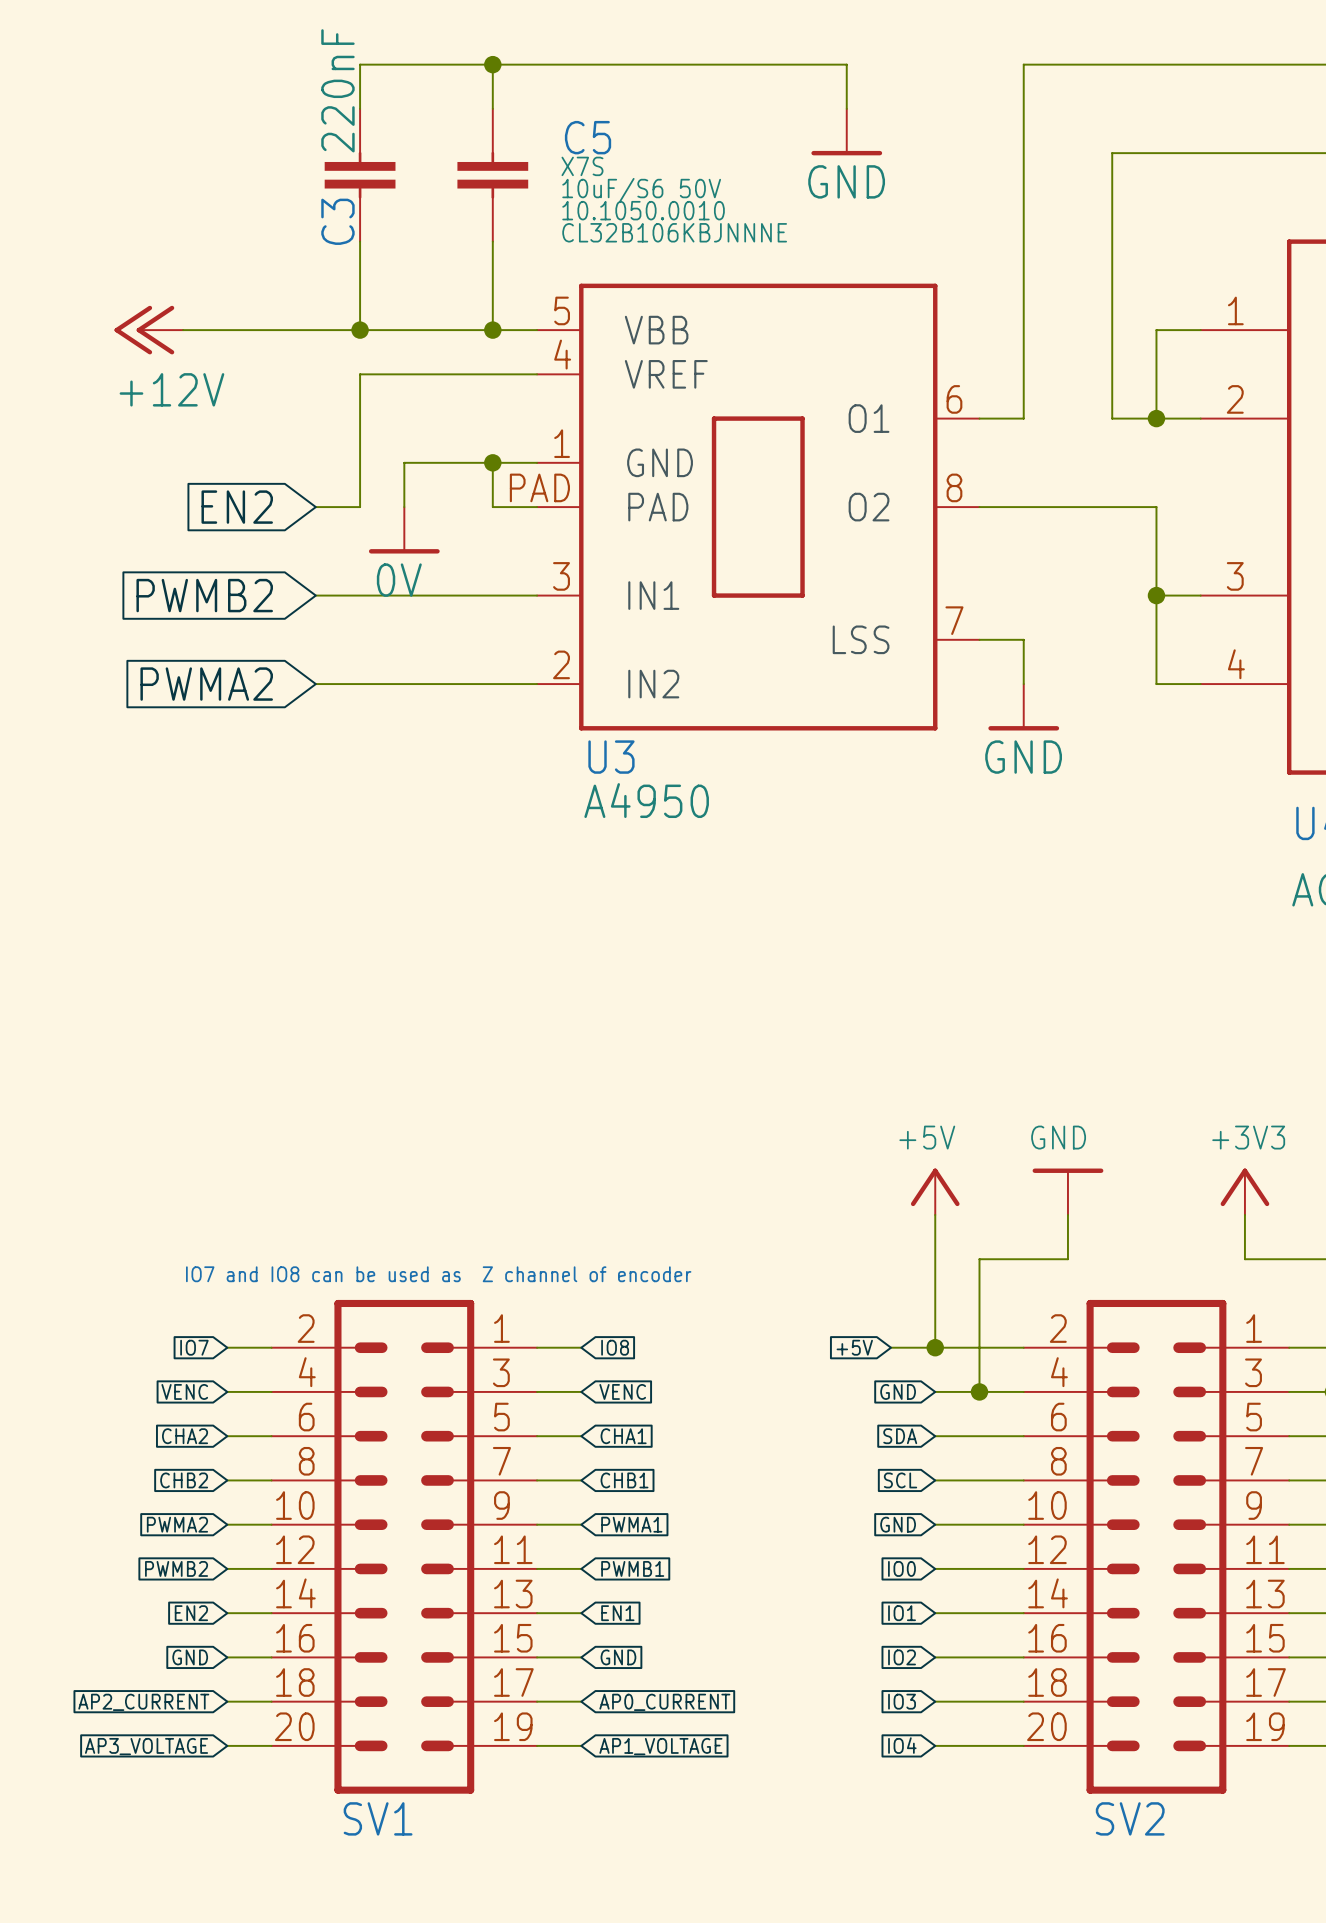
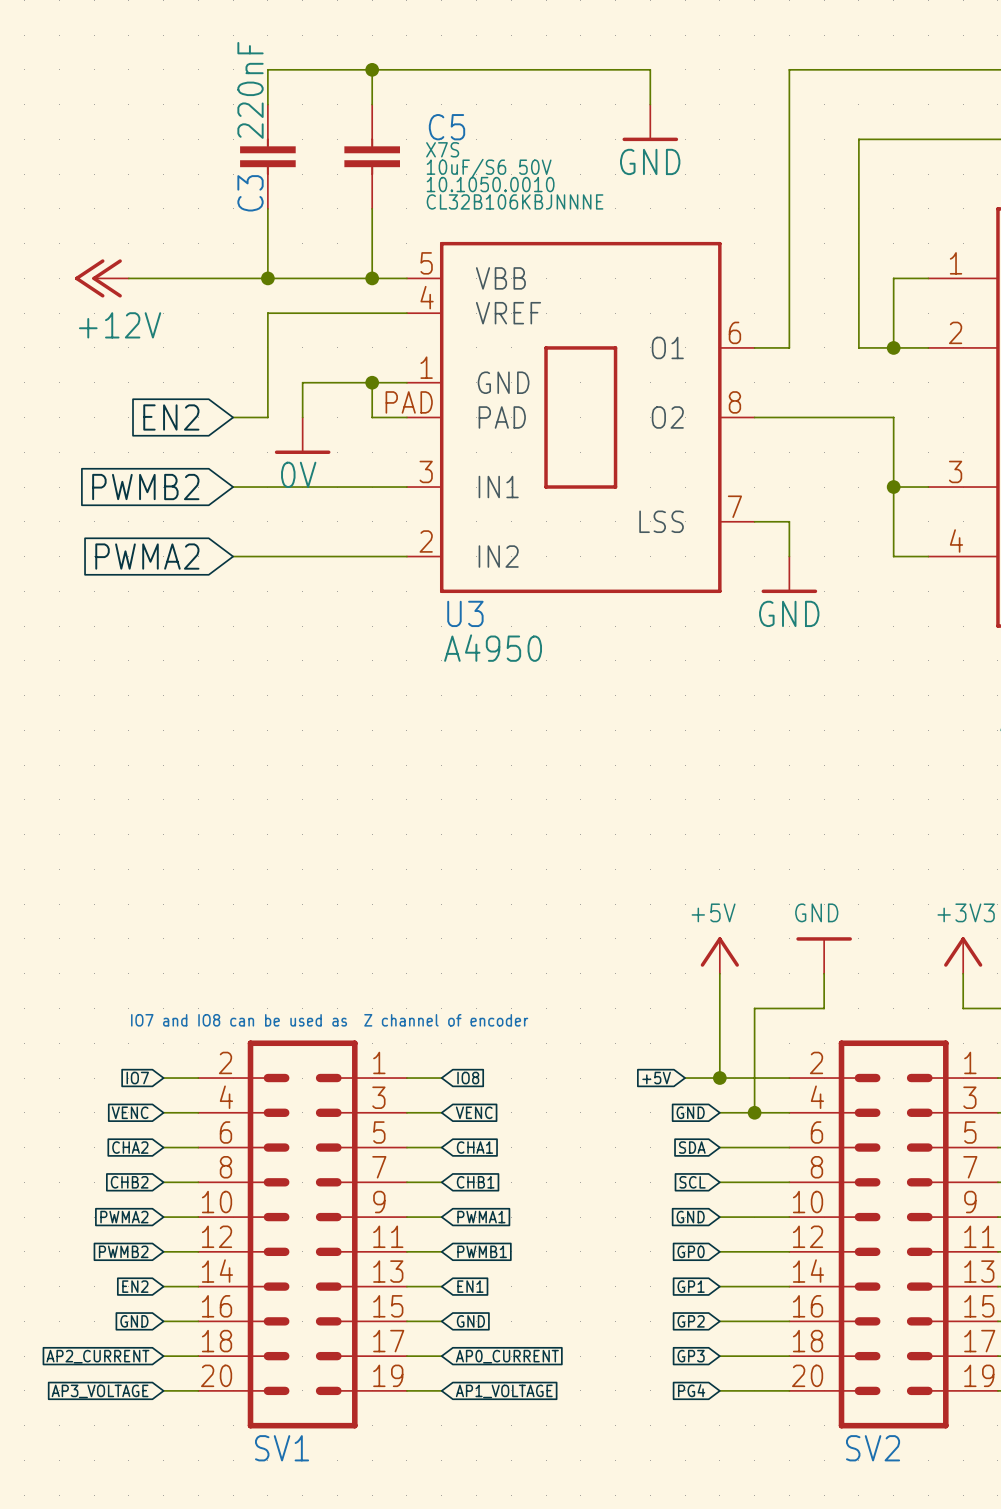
global label: IO0 (901, 1568) -> GP0 (691, 1251)
global label: IO1 (902, 1613) -> GP1 (691, 1286)
global label: IO2 (902, 1657) -> GP2 (691, 1321)
global label: IO3 (902, 1701) -> GP3 (691, 1356)
global label: IO4 (902, 1745) -> PG4 (691, 1390)

